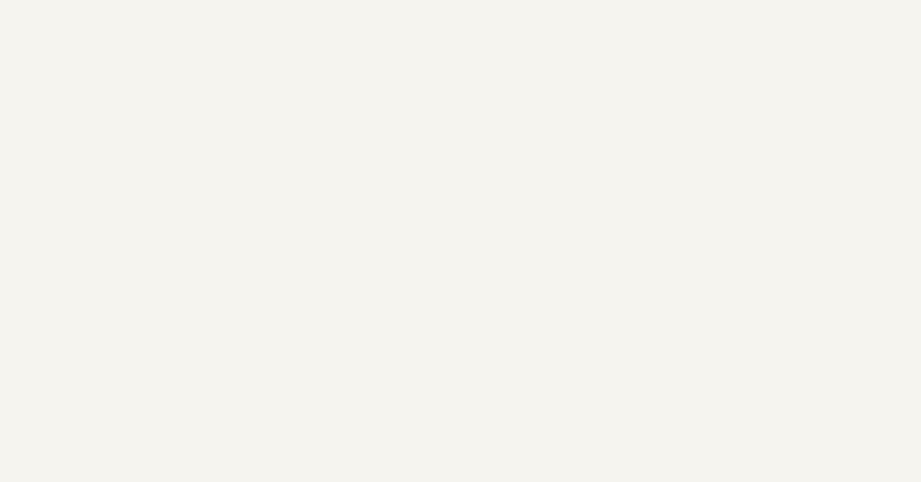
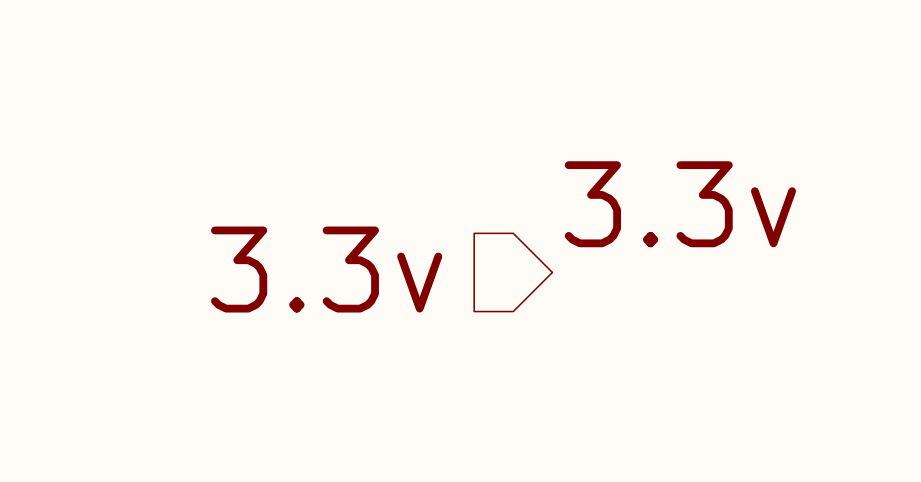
label: none -> 3.3v (680, 204)
hierarchical label: none -> 3.3v (326, 269)

